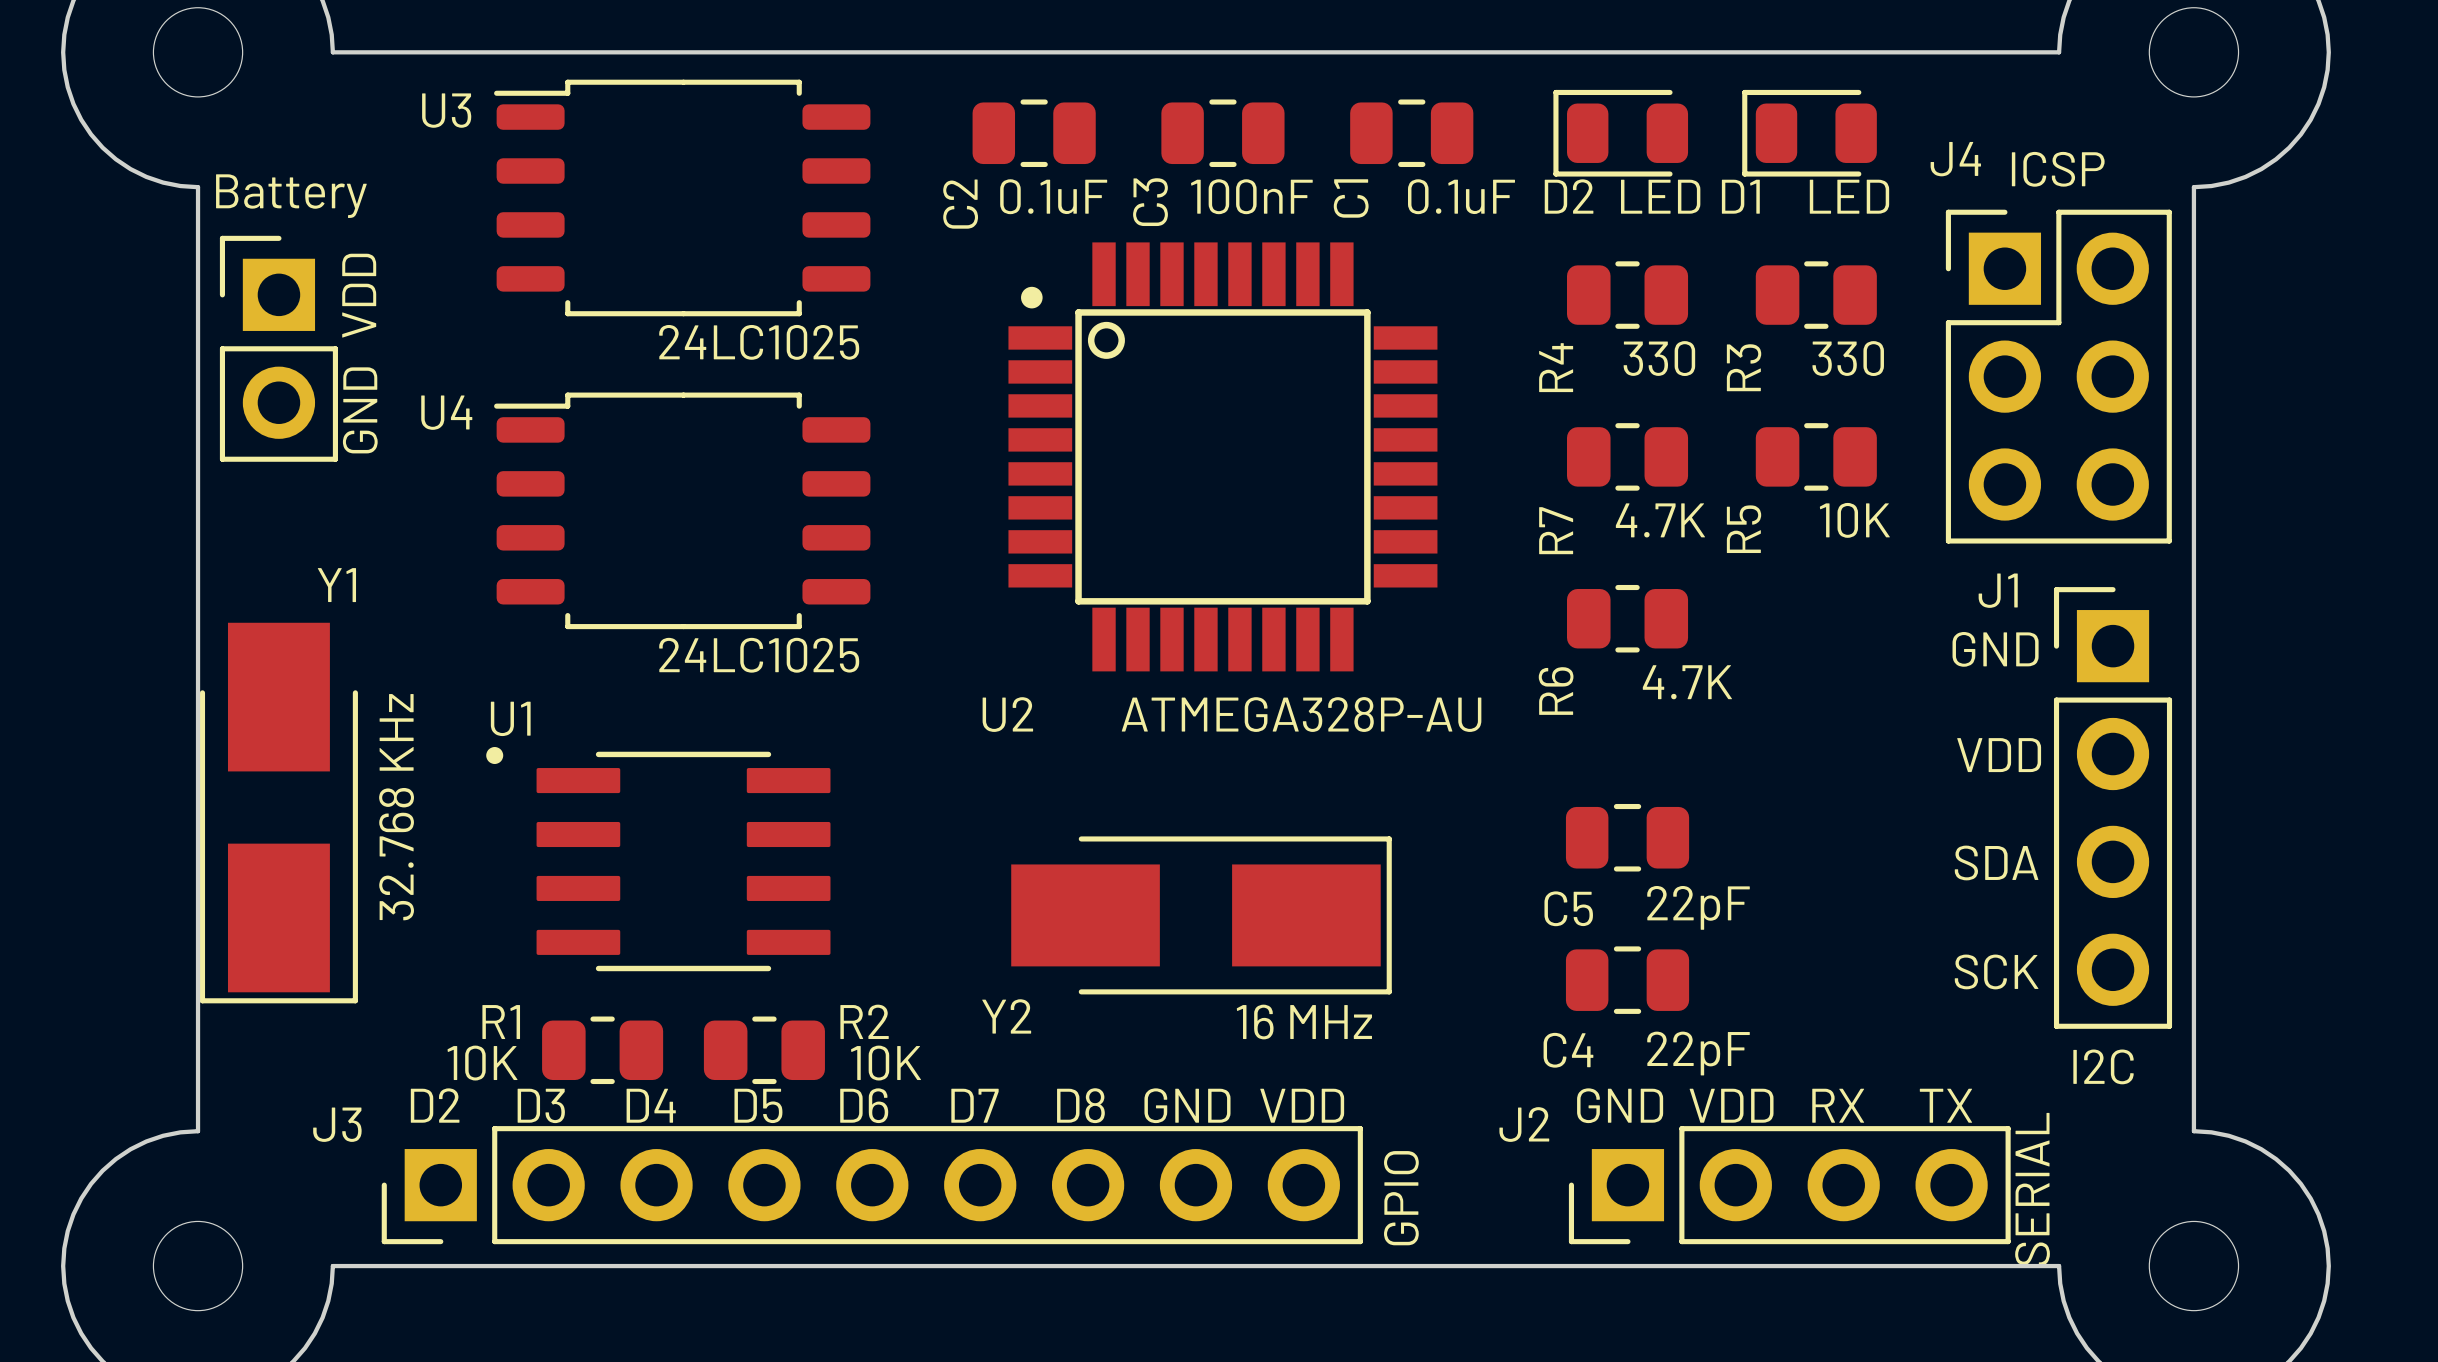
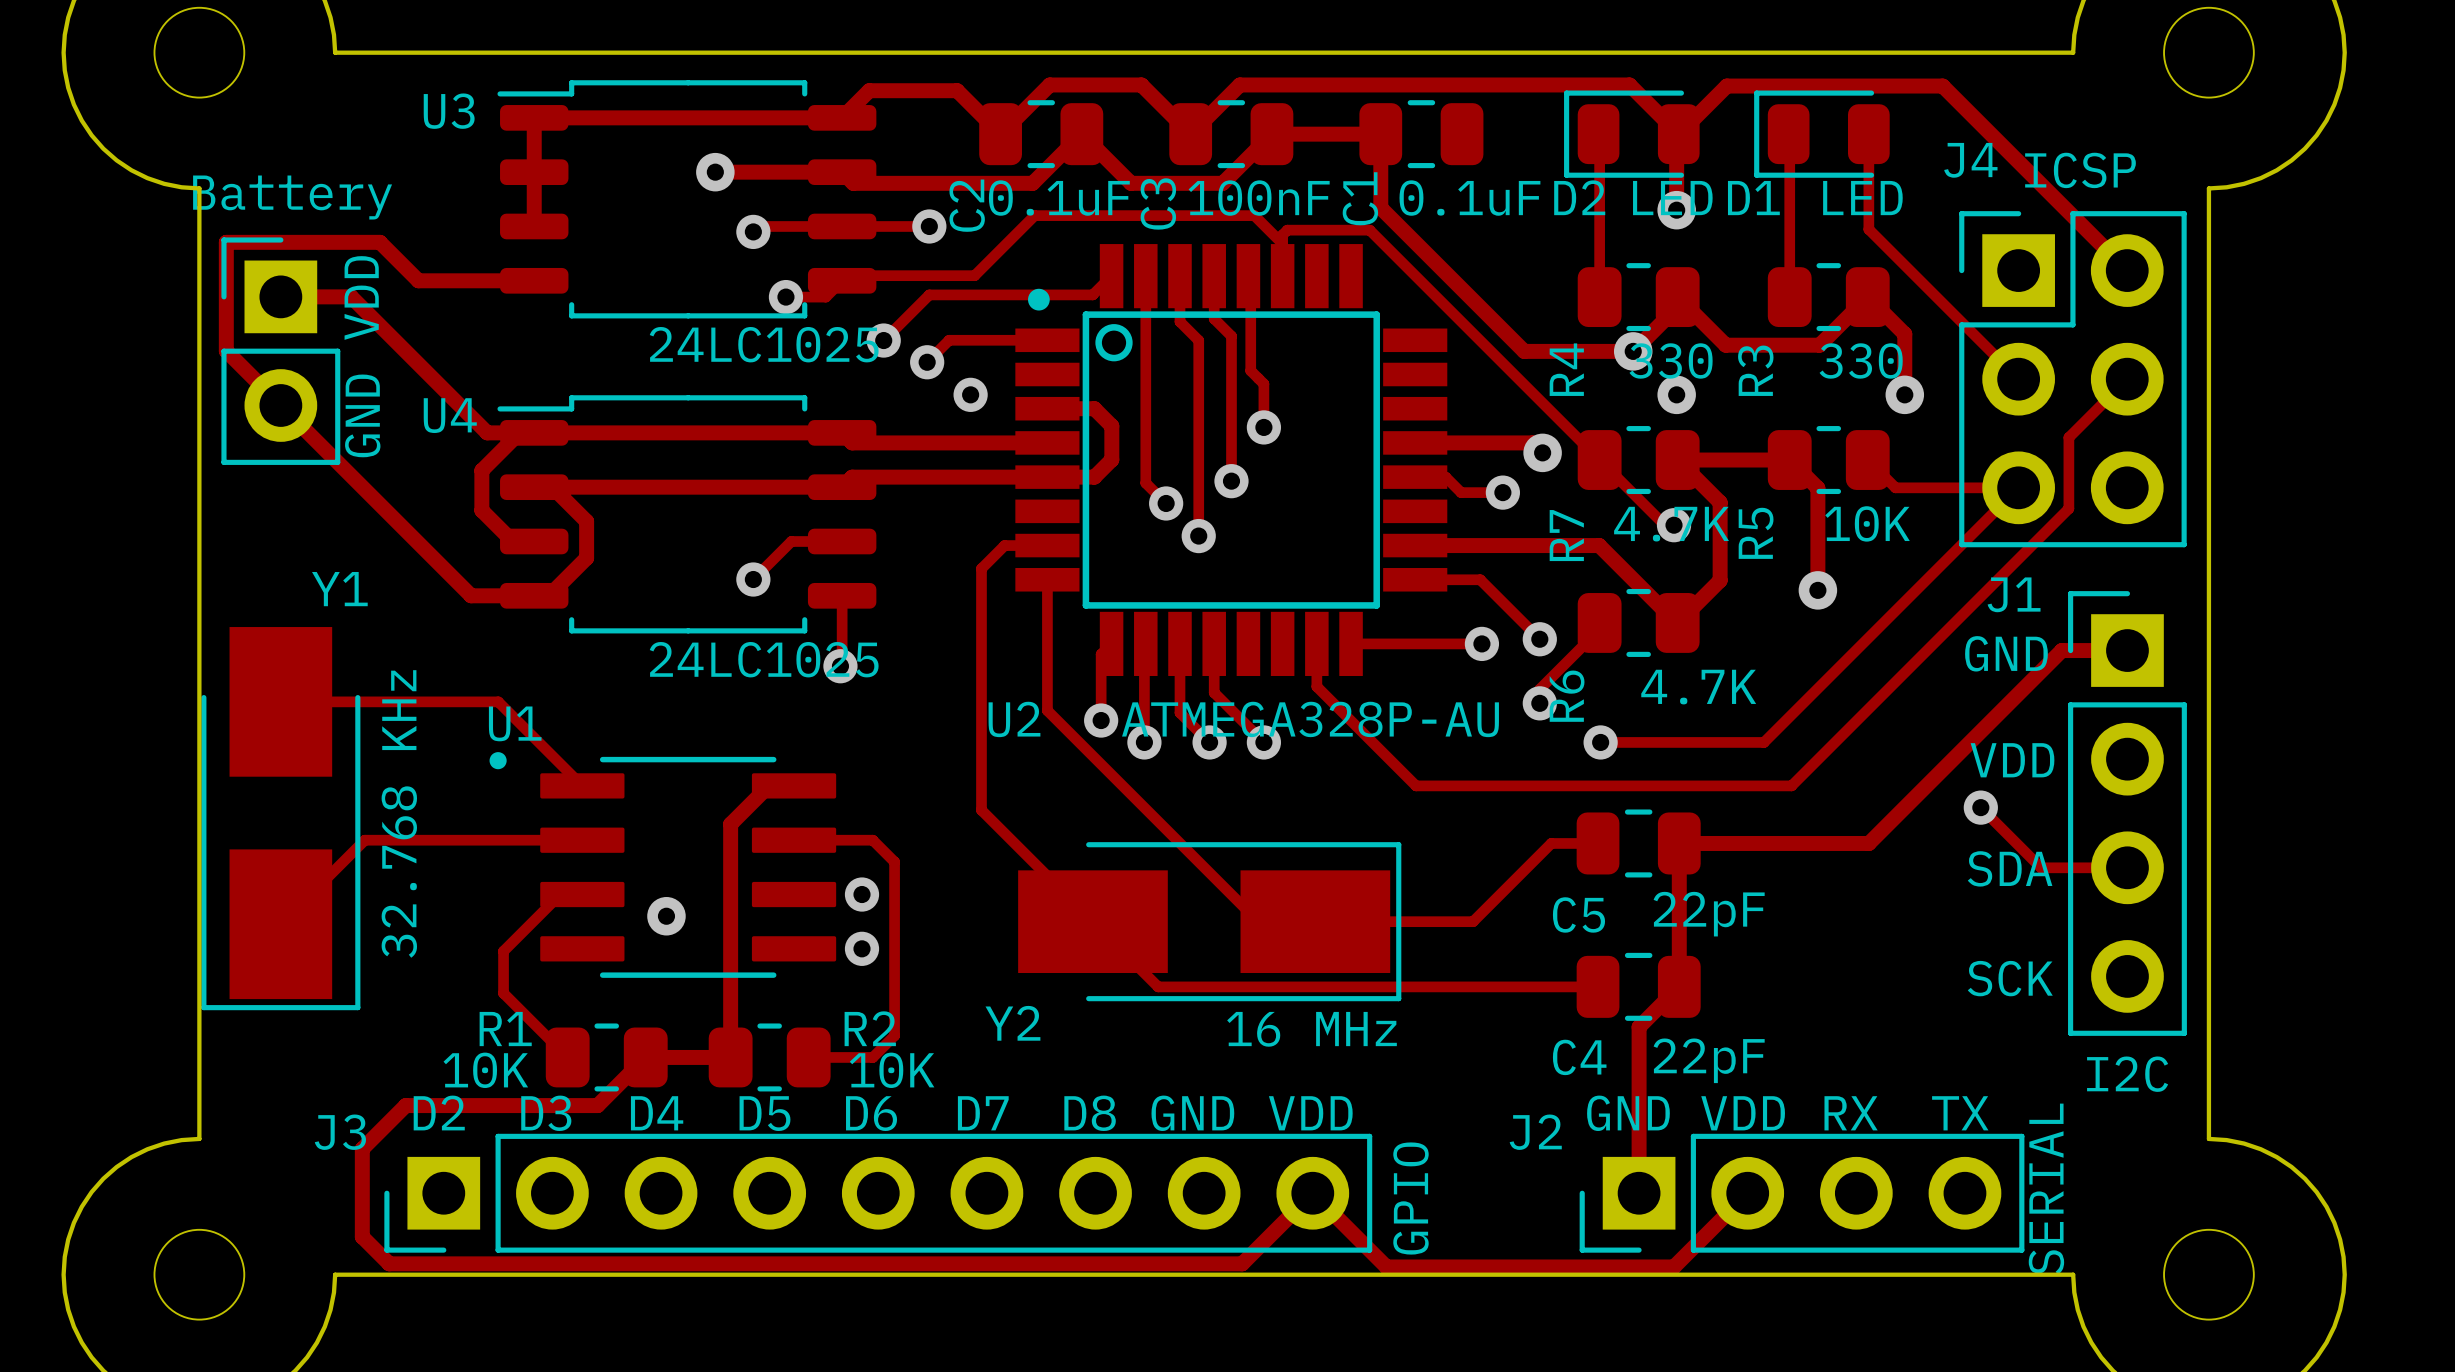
track: none -> (1598, 134) (1599, 297)
track: none -> (1678, 134) (1629, 84) (1239, 84) (1190, 134) (1141, 84) (1049, 84) (1000, 134) (957, 90) (869, 90) (842, 117) (534, 117) (534, 226)
track: none -> (1788, 134) (1789, 297)
track: none -> (1868, 134) (1868, 229) (2018, 379)
track: none -> (715, 172) (842, 172) (853, 183) (1032, 183) (1081, 134) (1131, 183) (1222, 183) (1271, 134) (1380, 134) (1380, 207) (1524, 351) (1633, 351) (1677, 306) (1677, 297) (1725, 345) (1819, 345) (1867, 297) (1904, 334) (1904, 394)
via: none -> (715, 172)
track: none -> (1676, 210) (1676, 136) (1726, 86) (1942, 86) (2127, 270)
via: none -> (1676, 210)
track: none -> (929, 226) (758, 226) (753, 231)
via: none -> (929, 226)
via: none -> (753, 231)
track: none -> (1282, 243) (1254, 215) (1034, 215) (974, 275) (847, 275) (825, 297) (785, 297)
track: none -> (1111, 276) (1092, 294) (929, 294) (883, 340)
track: none -> (1145, 276) (1145, 483) (1166, 503)
track: none -> (1180, 276) (1180, 321) (1198, 340) (1198, 536)
track: none -> (1214, 276) (1214, 318) (1231, 336) (1231, 481)
track: none -> (1248, 276) (1250, 278) (1250, 370) (1263, 383) (1263, 427)
track: none -> (1282, 276) (1282, 234) (1287, 230) (1369, 230) (1664, 525) (1674, 525)
track: none -> (534, 280) (418, 280) (380, 242) (226, 242) (226, 350) (471, 595) (548, 595) (586, 558) (586, 521) (552, 487)
track: none -> (280, 296) (351, 296) (487, 432) (842, 432) (852, 442) (1047, 442)
via: none -> (785, 297)
track: none -> (1047, 340) (949, 340) (927, 362)
via: none -> (883, 340)
via: none -> (1633, 351)
via: none -> (927, 362)
track: none -> (2127, 379) (2068, 437) (2068, 508) (1791, 785) (1416, 785) (1316, 686) (1316, 643)
via: none -> (970, 394)
via: none -> (1676, 394)
via: none -> (1904, 394)
track: none -> (1047, 408) (1094, 408) (1111, 426) (1111, 459) (1094, 477) (852, 477) (842, 487) (534, 487)
via: none -> (1263, 427)
track: none -> (519, 432) (481, 470) (481, 510) (512, 541) (534, 541)
track: none -> (1415, 442) (1532, 442) (1542, 452)
via: none -> (1542, 452)
track: none -> (1867, 460) (1895, 487) (2018, 487) (1764, 742) (1600, 742)
track: none -> (1415, 477) (1445, 477) (1461, 492) (1502, 492)
via: none -> (1231, 481)
via: none -> (1502, 492)
via: none -> (1166, 503)
via: none -> (1674, 525)
via: none -> (1198, 536)
track: none -> (842, 541) (791, 541) (753, 579)
track: none -> (1047, 545) (1004, 545) (981, 568) (981, 810) (1158, 986) (1597, 986)
track: none -> (1415, 545) (1599, 545) (1677, 622) (1720, 580) (1720, 502) (1677, 460) (1789, 460) (1817, 488) (1817, 590)
via: none -> (753, 579)
track: none -> (1047, 579) (1047, 710) (1258, 921) (1473, 921) (1551, 843) (1598, 843)
track: none -> (1415, 579) (1480, 579) (1539, 639)
via: none -> (1817, 590)
track: none -> (842, 595) (842, 664) (840, 666)
track: none -> (1599, 622) (1599, 629) (1539, 689) (1539, 703)
via: none -> (1539, 639)
track: none -> (1111, 643) (1101, 654) (1101, 720)
track: none -> (1145, 643) (1144, 742)
track: none -> (1180, 643) (1180, 712) (1209, 742)
track: none -> (1214, 643) (1214, 692) (1263, 742)
track: none -> (1351, 643) (1481, 643)
via: none -> (1481, 643)
track: none -> (2127, 650) (2061, 650) (1868, 843) (1679, 843) (1679, 986) (1639, 1027) (1639, 1193)
via: none -> (840, 666)
track: none -> (280, 701) (498, 701) (582, 785)
via: none -> (1539, 703)
via: none -> (1101, 720)
via: none -> (1144, 742)
via: none -> (1209, 742)
via: none -> (1263, 742)
via: none -> (1600, 742)
track: none -> (794, 785) (768, 785) (730, 824) (730, 1057) (645, 1057) (597, 1105) (405, 1105) (362, 1149) (362, 1236) (389, 1263) (1242, 1263) (1312, 1193) (1386, 1266) (1673, 1266) (1747, 1193)
track: none -> (1980, 807) (2041, 867) (2127, 867)
via: none -> (1980, 807)
track: none -> (582, 840) (364, 840) (280, 924)
track: none -> (794, 840) (872, 840) (894, 861) (894, 1035) (872, 1057) (808, 1057)
track: none -> (582, 894) (560, 894) (503, 951) (503, 993) (567, 1057)
via: none -> (861, 894)
via: none -> (666, 916)
via: none -> (861, 948)

